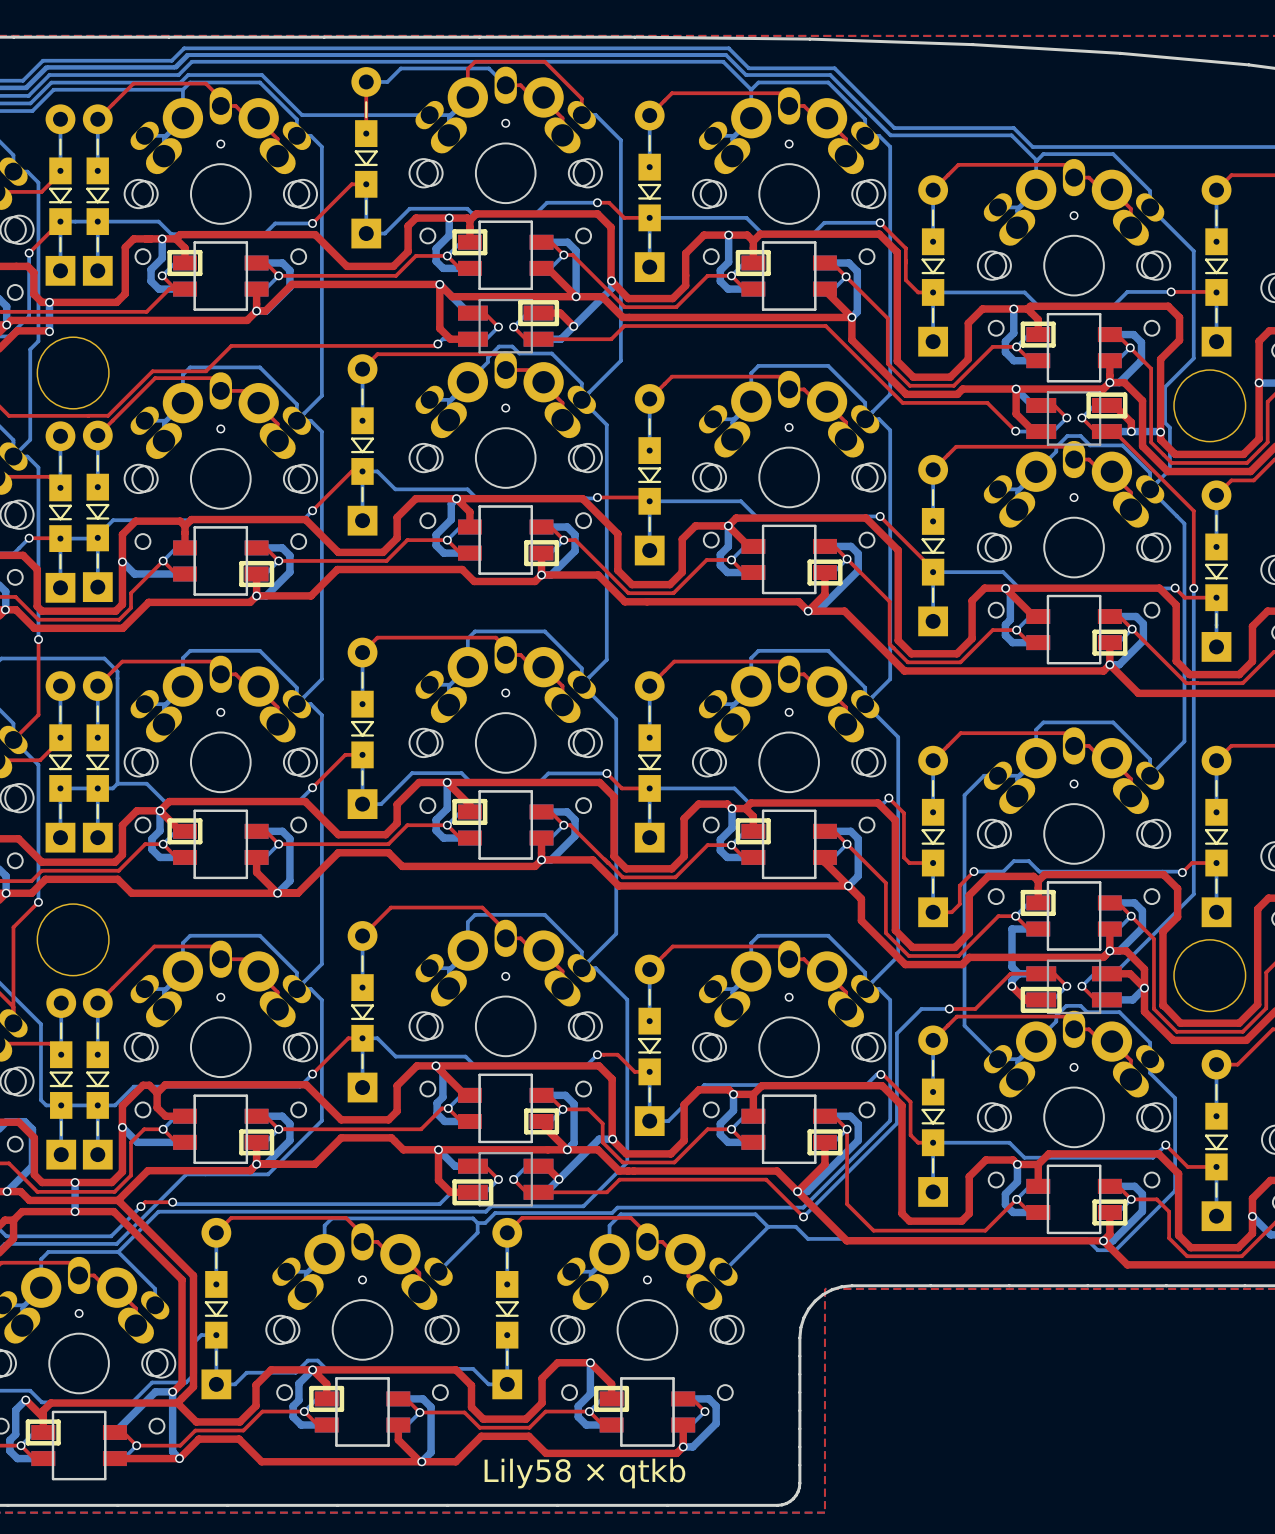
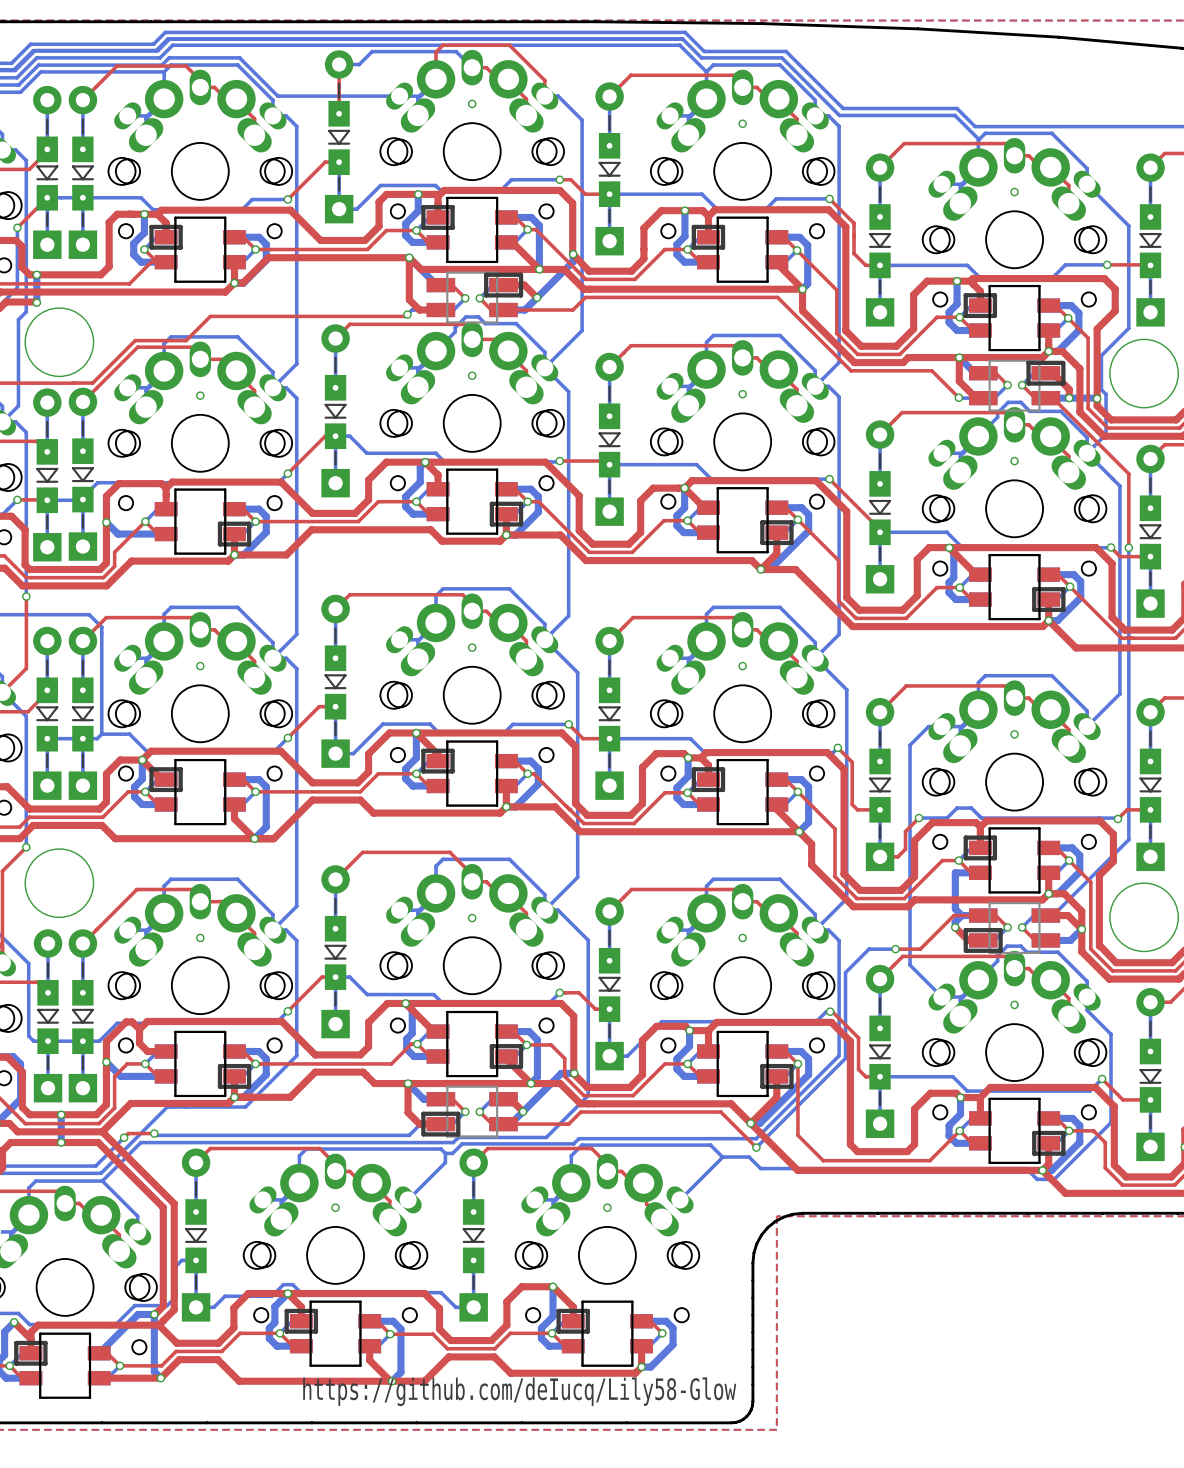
via: (220, 144) -> none
via: (79, 1313) -> none
text: none -> https://github.com/deIucq/Lily58-Glow (519, 1391)
text: Lily58 × qtkb (584, 1473) -> none

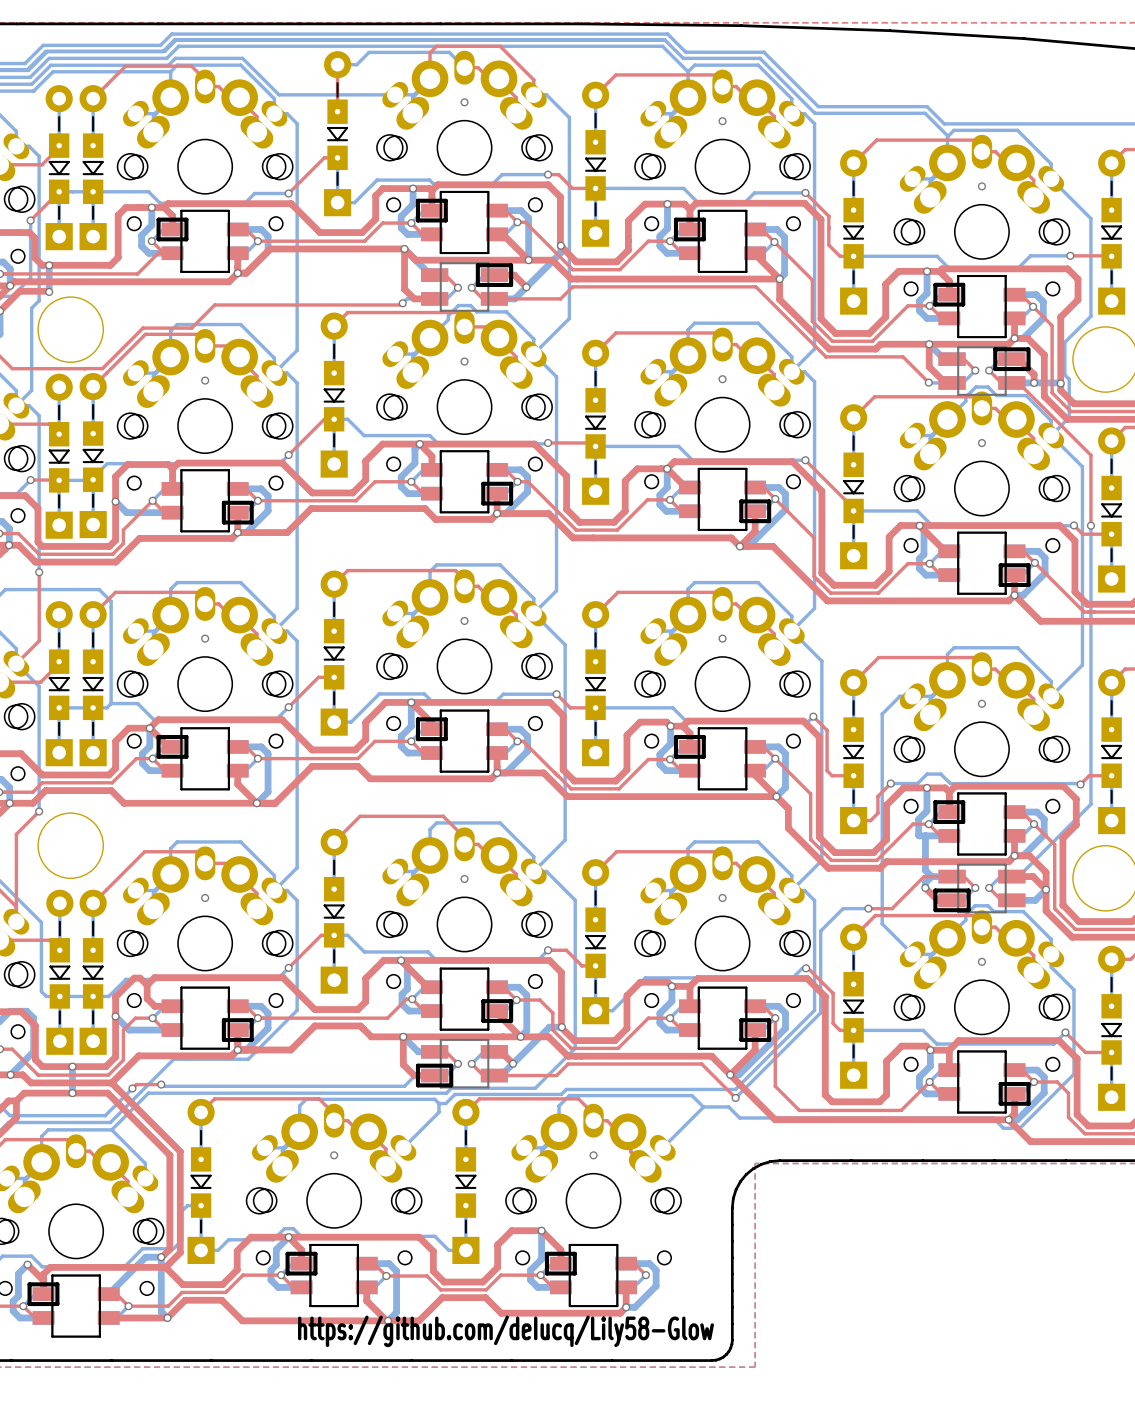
bottom track: none -> (926, 787) (926, 811) (918, 819) (918, 835) (925, 835)
via: none -> (926, 787)

